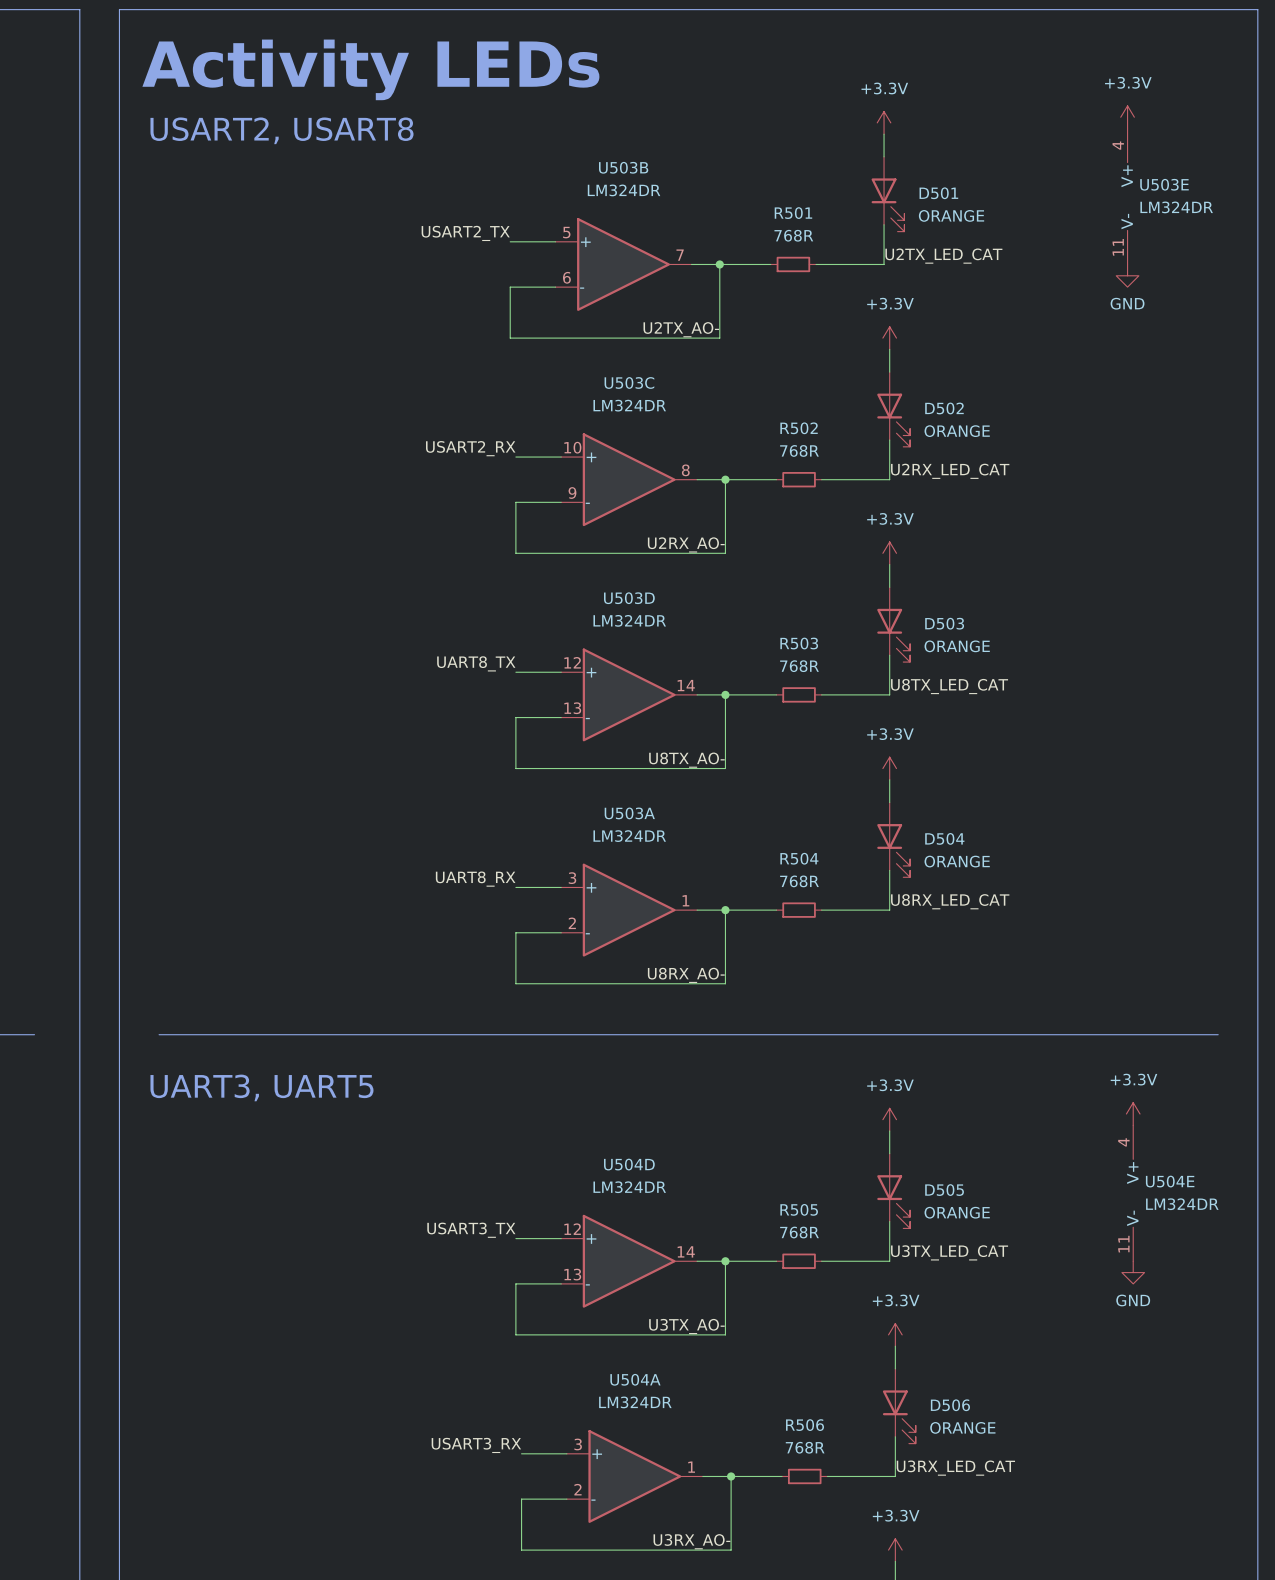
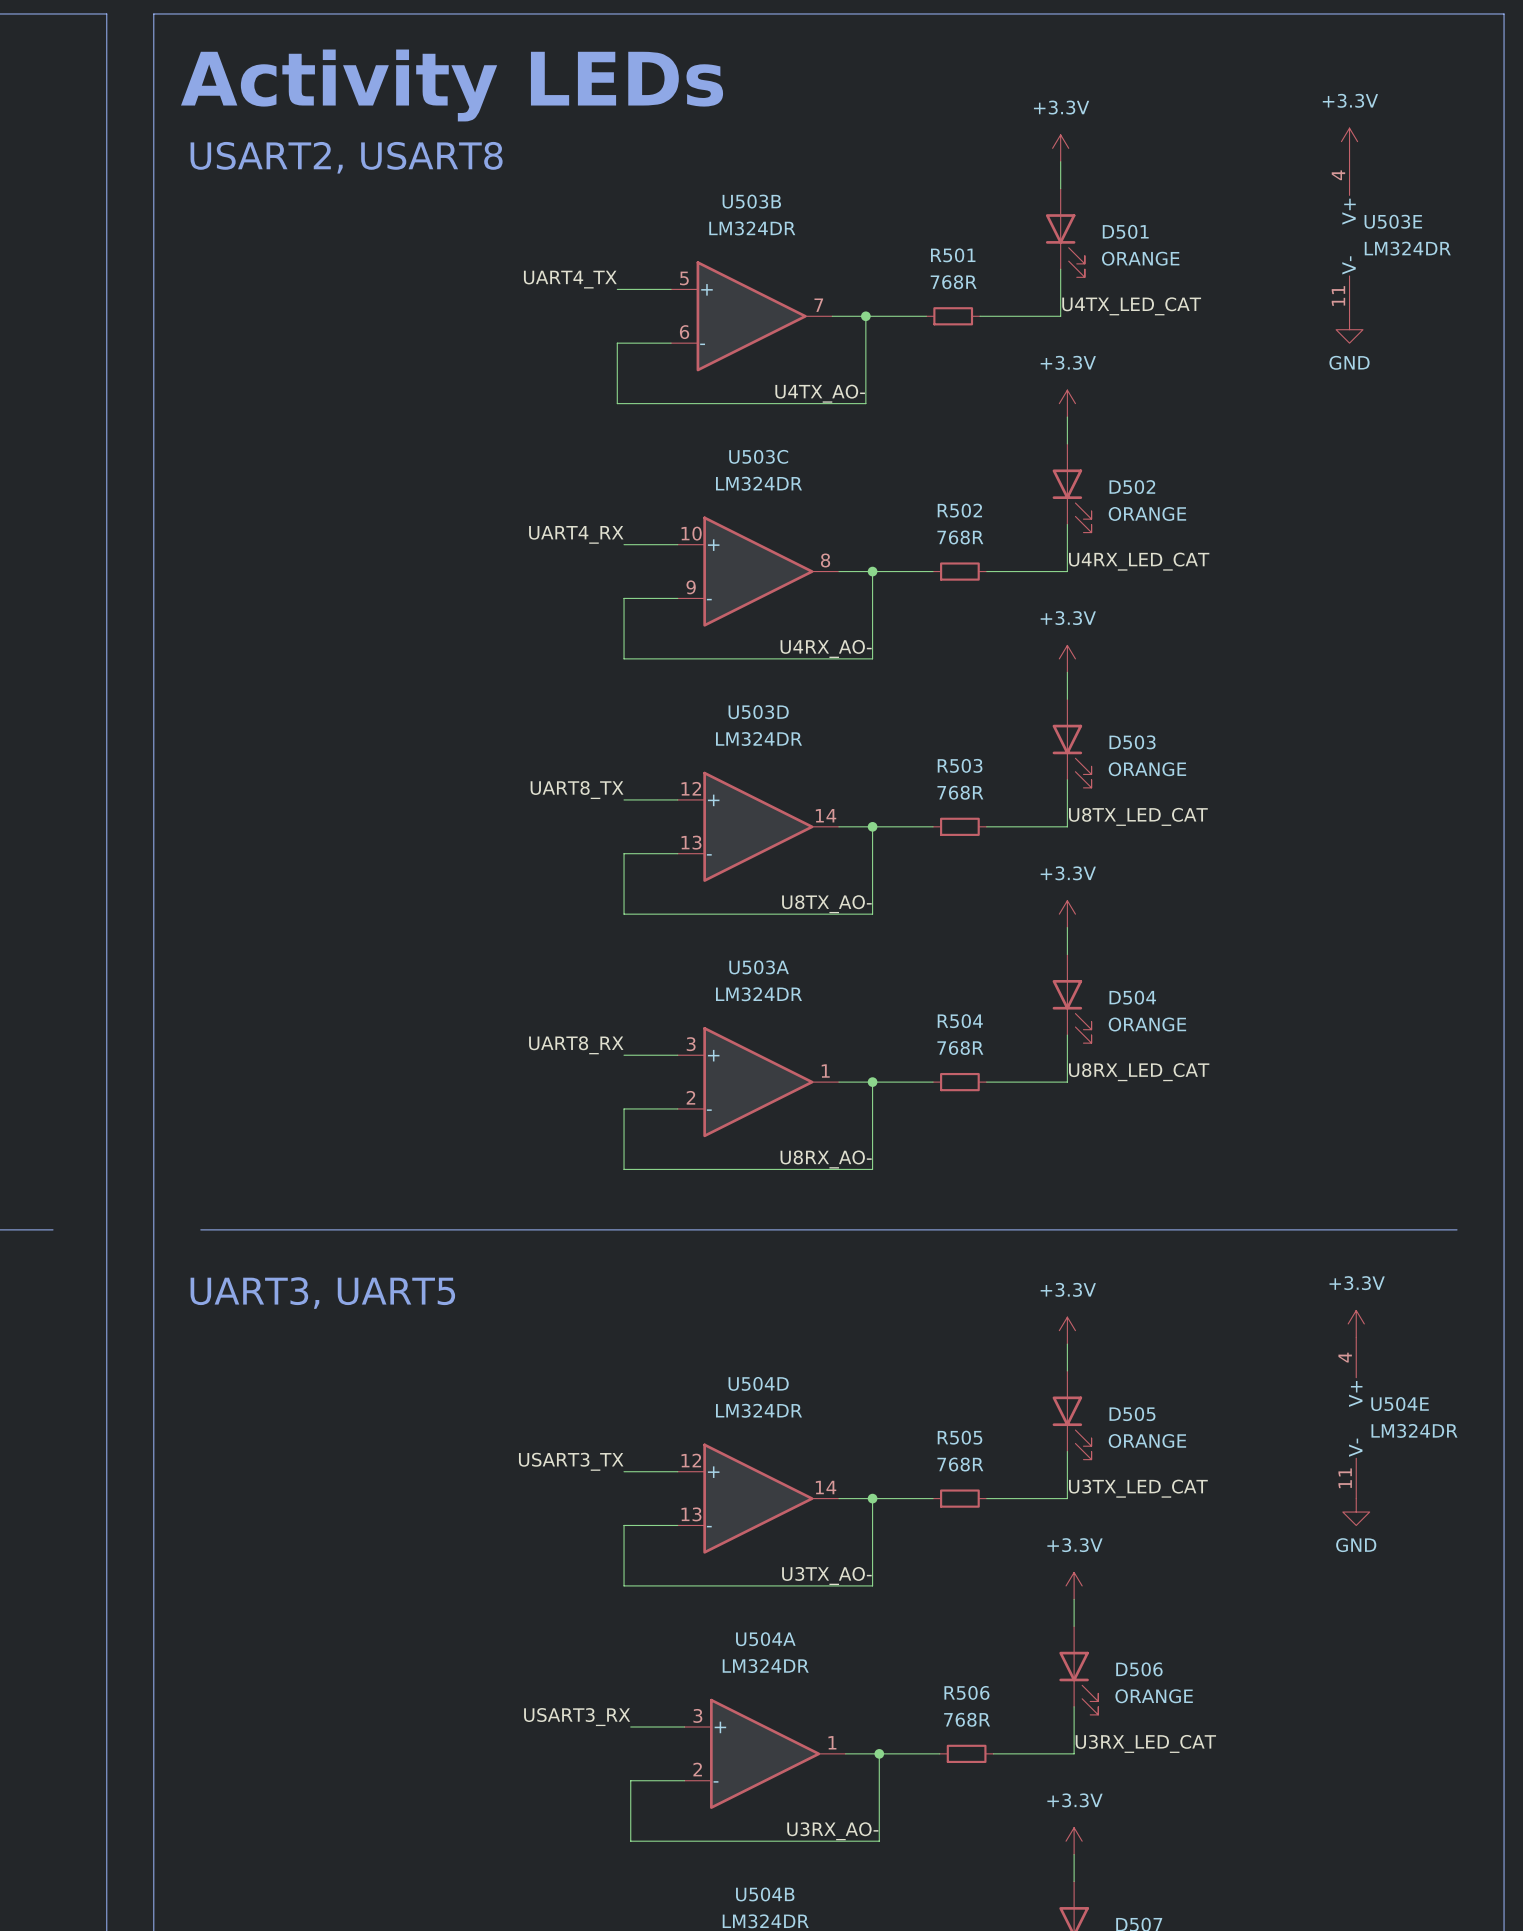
label: USART2_TX (465, 233) -> UART4_TX (570, 279)
label: U2TX_LED_CAT (943, 256) -> U4TX_LED_CAT (1131, 306)
label: U2TX_AO- (681, 329) -> U4TX_AO- (820, 393)
label: USART2_RX (470, 448) -> UART4_RX (576, 534)
label: U2RX_LED_CAT (950, 471) -> U4RX_LED_CAT (1139, 561)
label: U2RX_AO- (686, 544) -> U4RX_AO- (826, 648)

